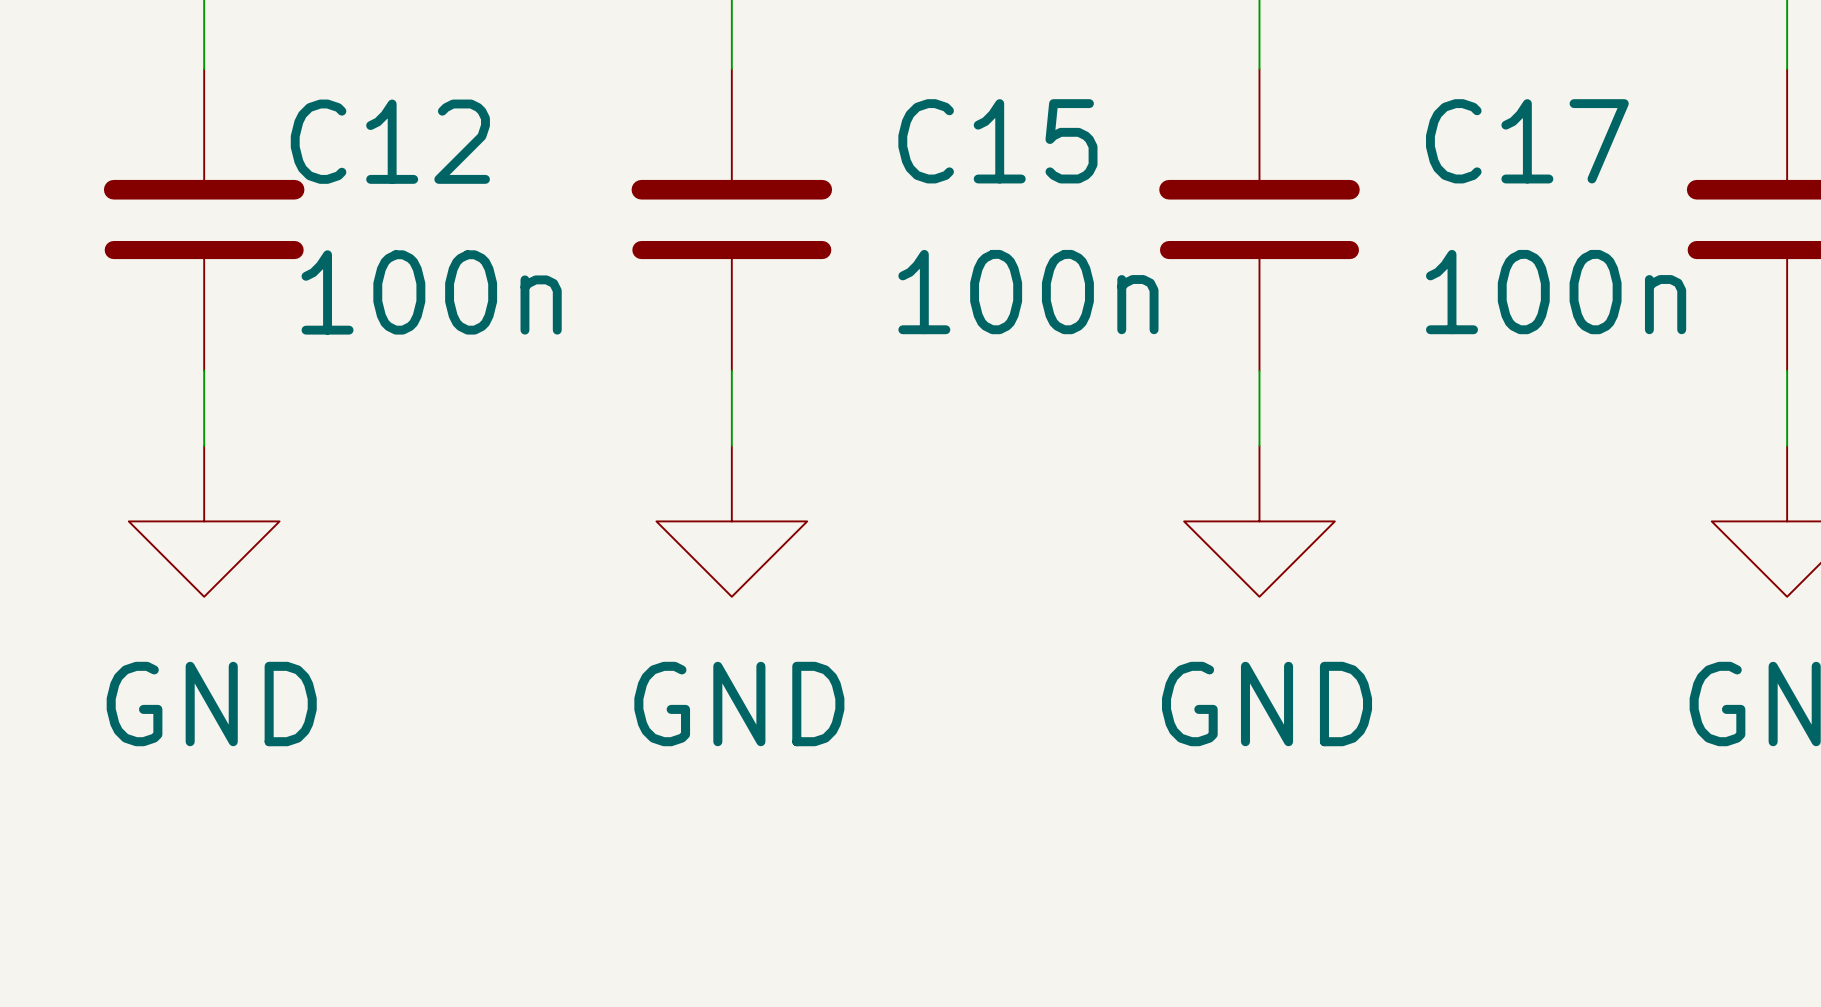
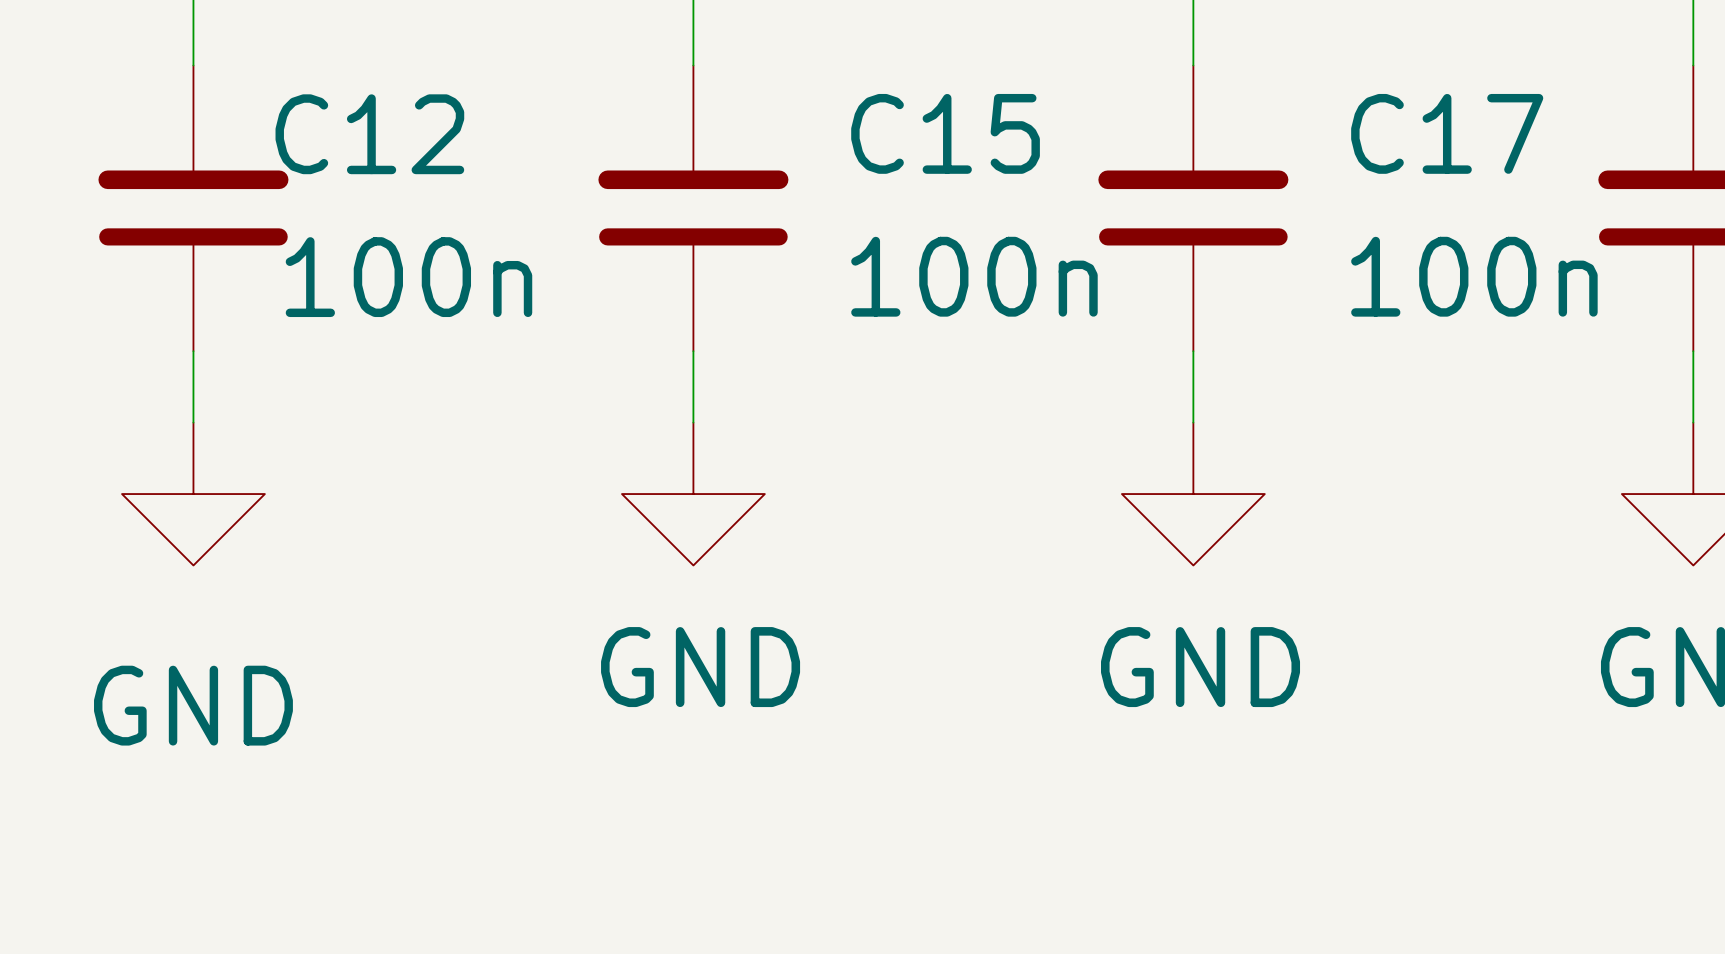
power symbol text position: GND (211, 704) -> GND (193, 705)

